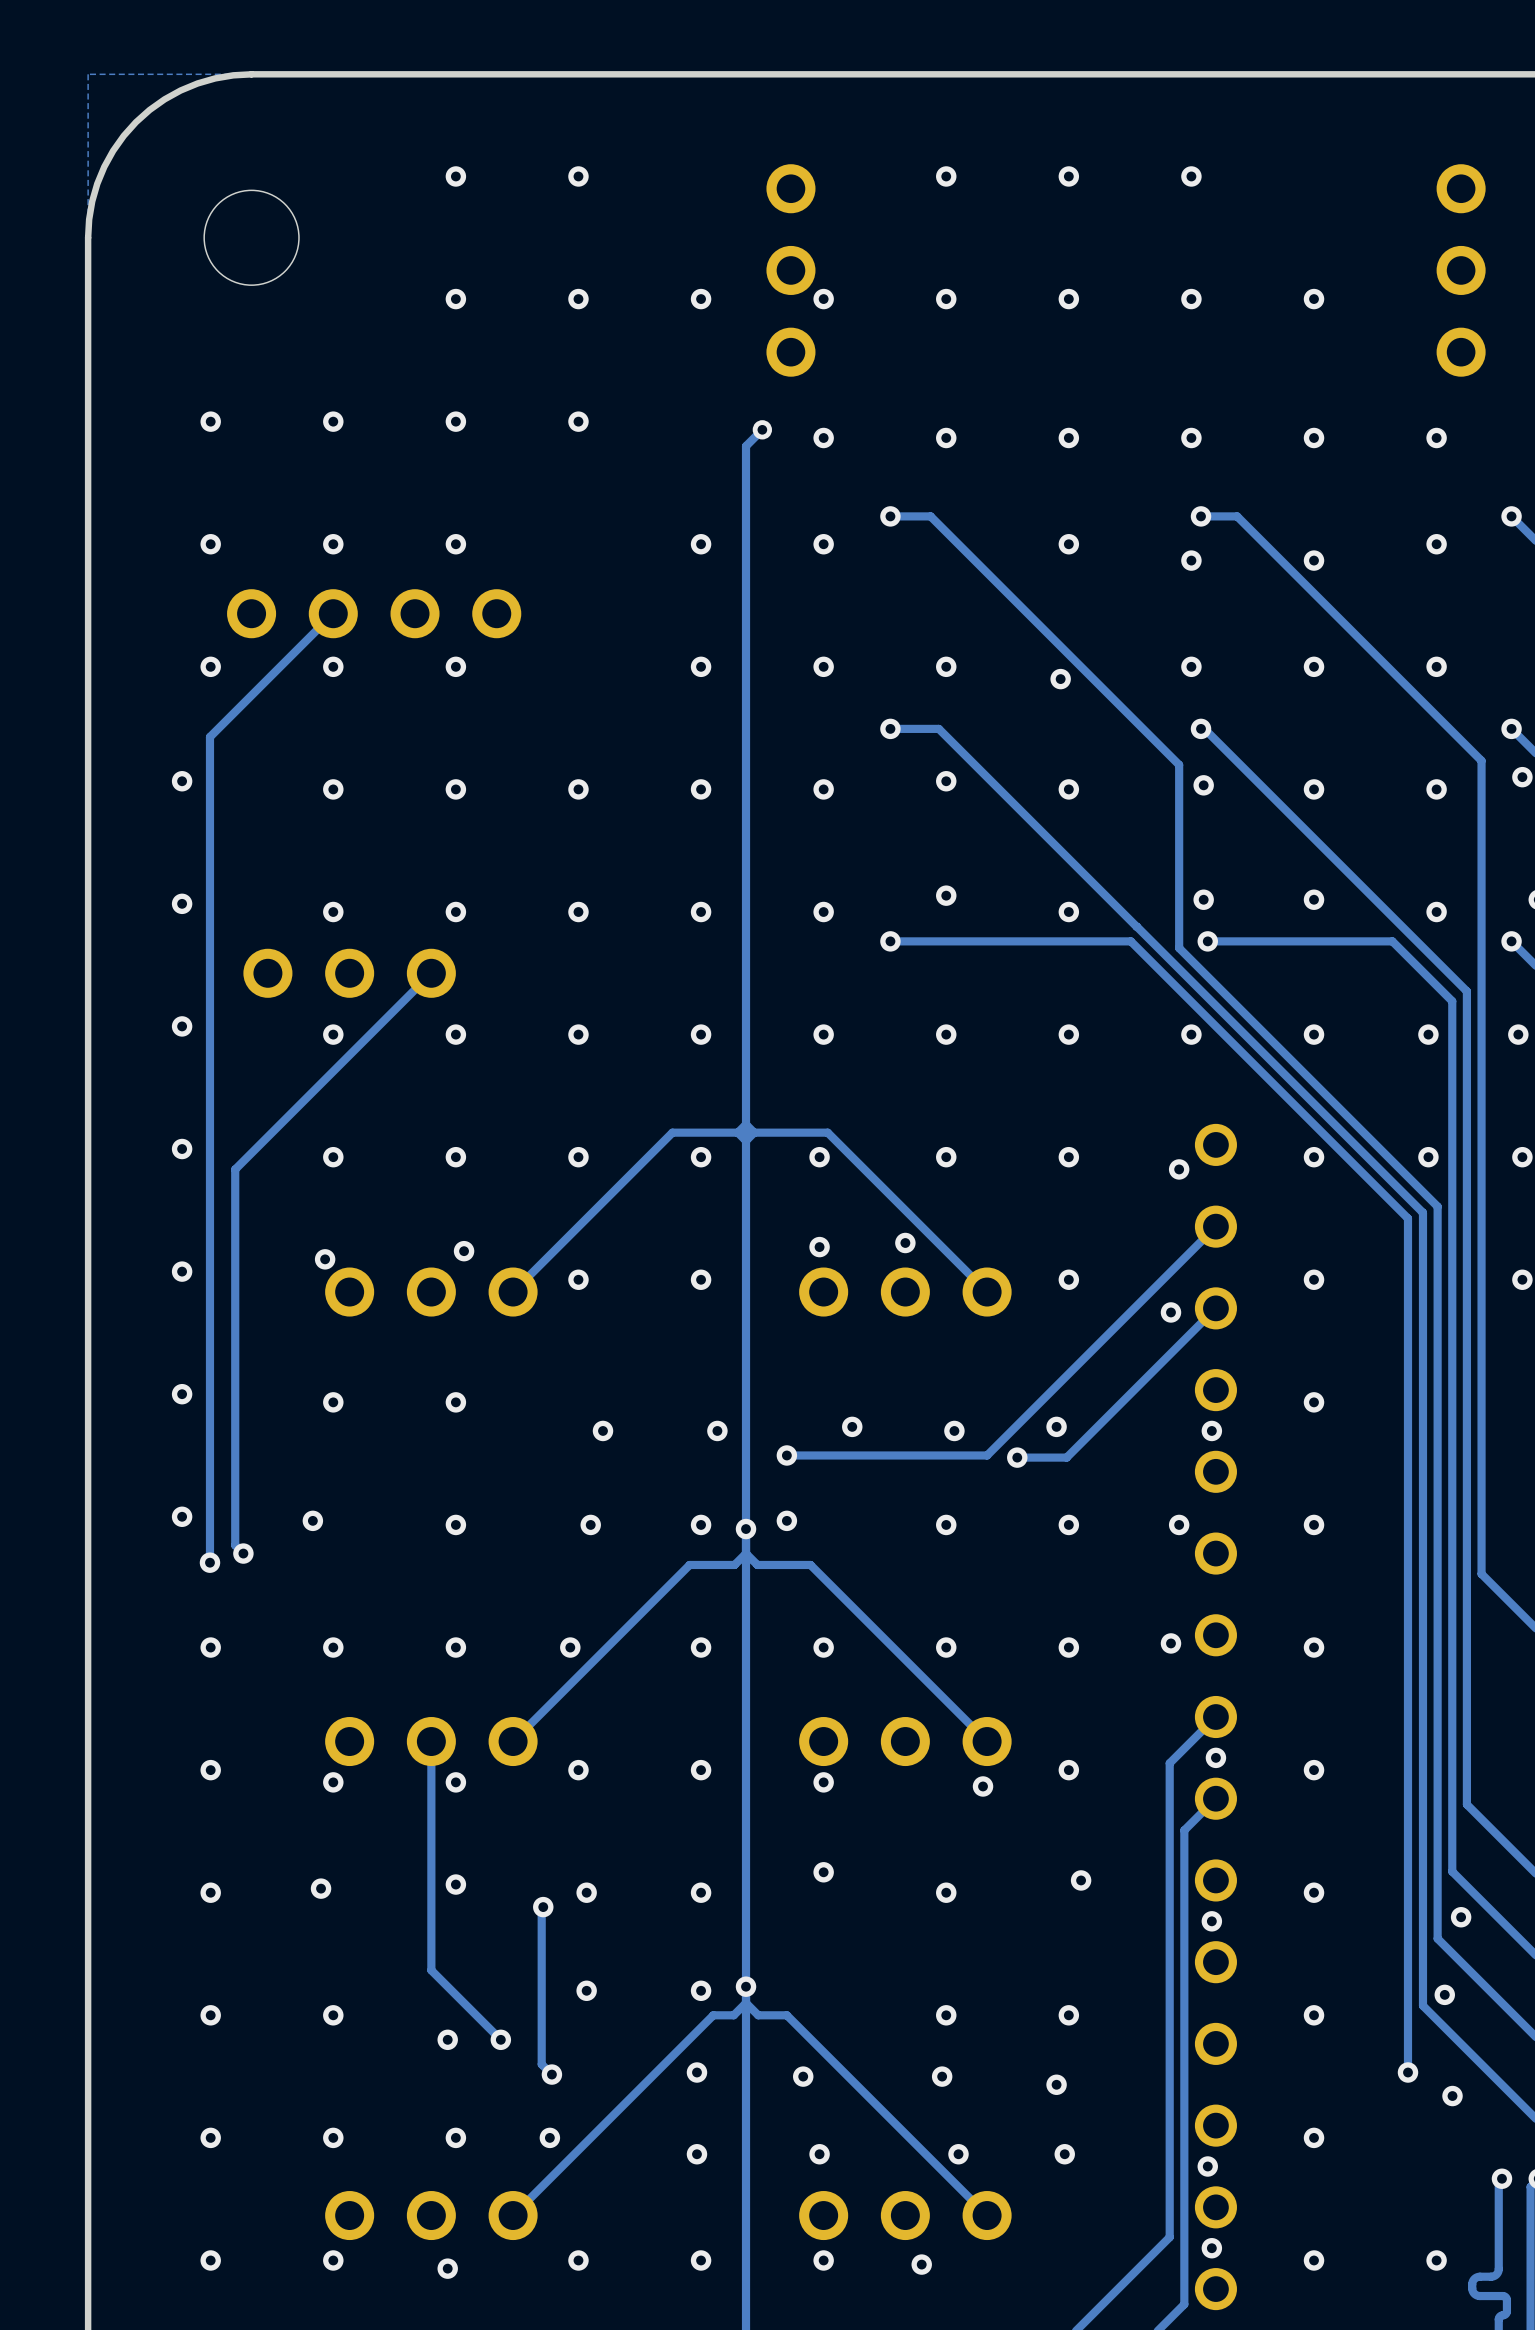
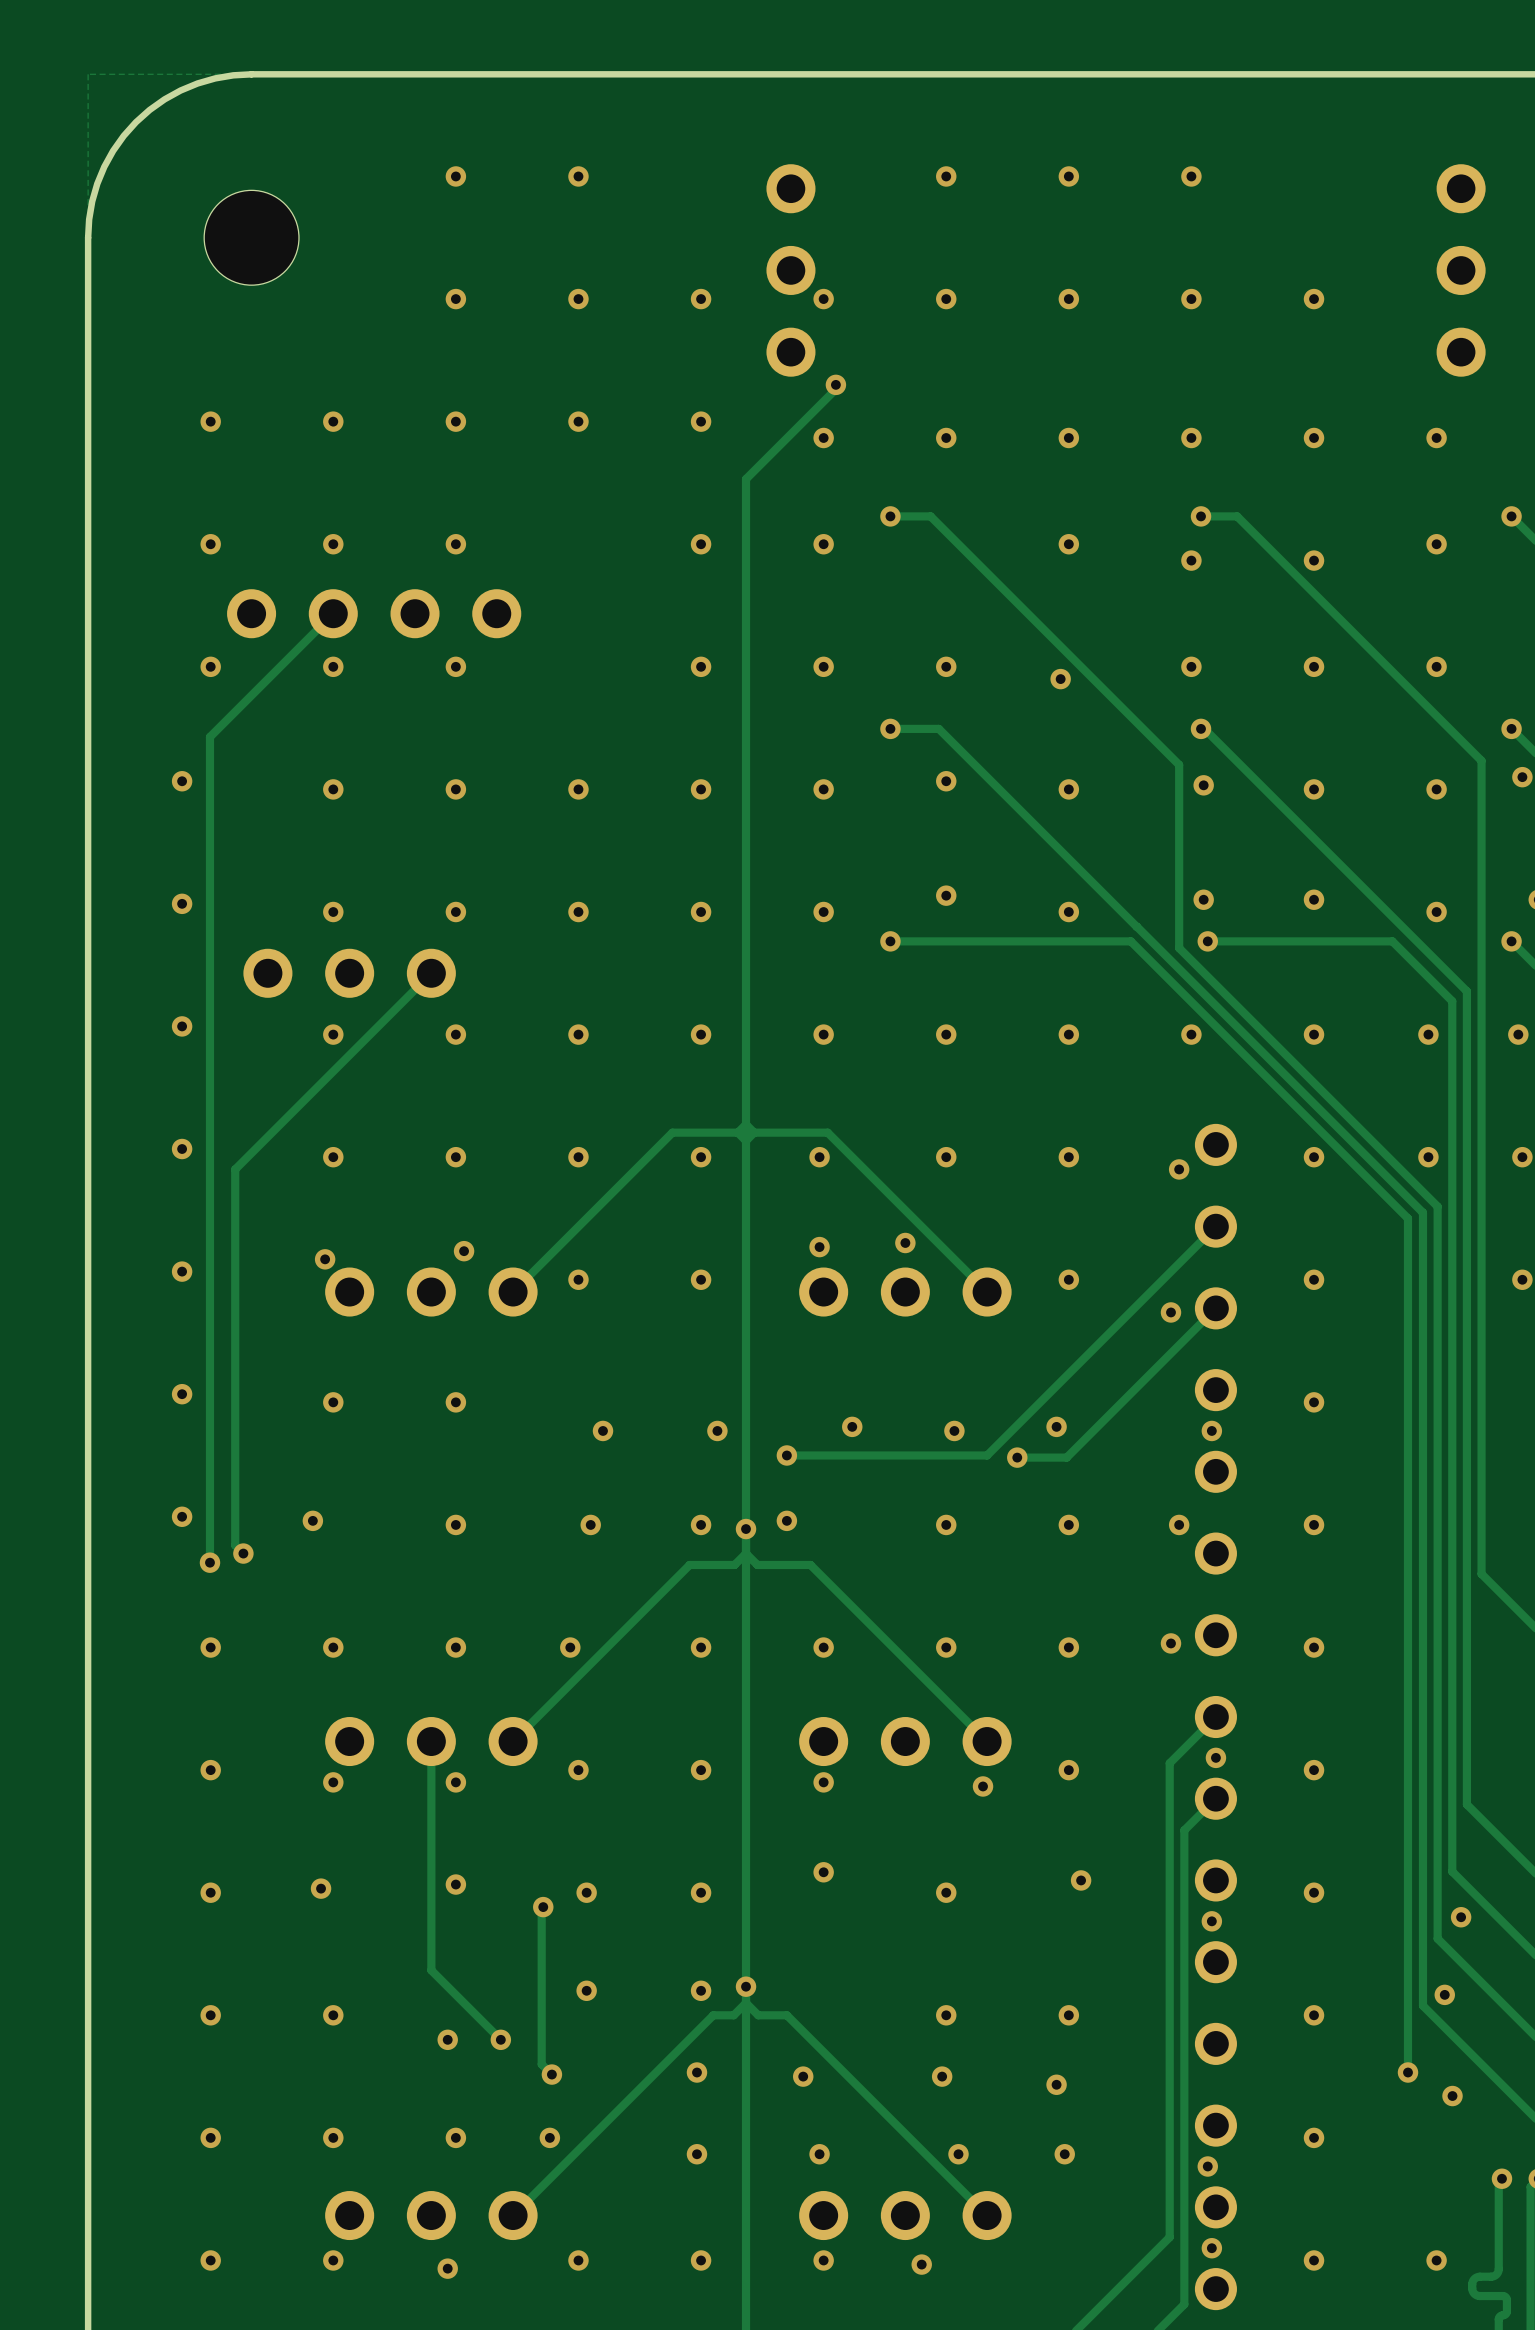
via: none -> (835, 384)
via: none -> (701, 421)
track: (762, 429) (746, 446) (746, 479) -> (835, 384) (835, 389) (746, 479)
via: (762, 429) -> none

